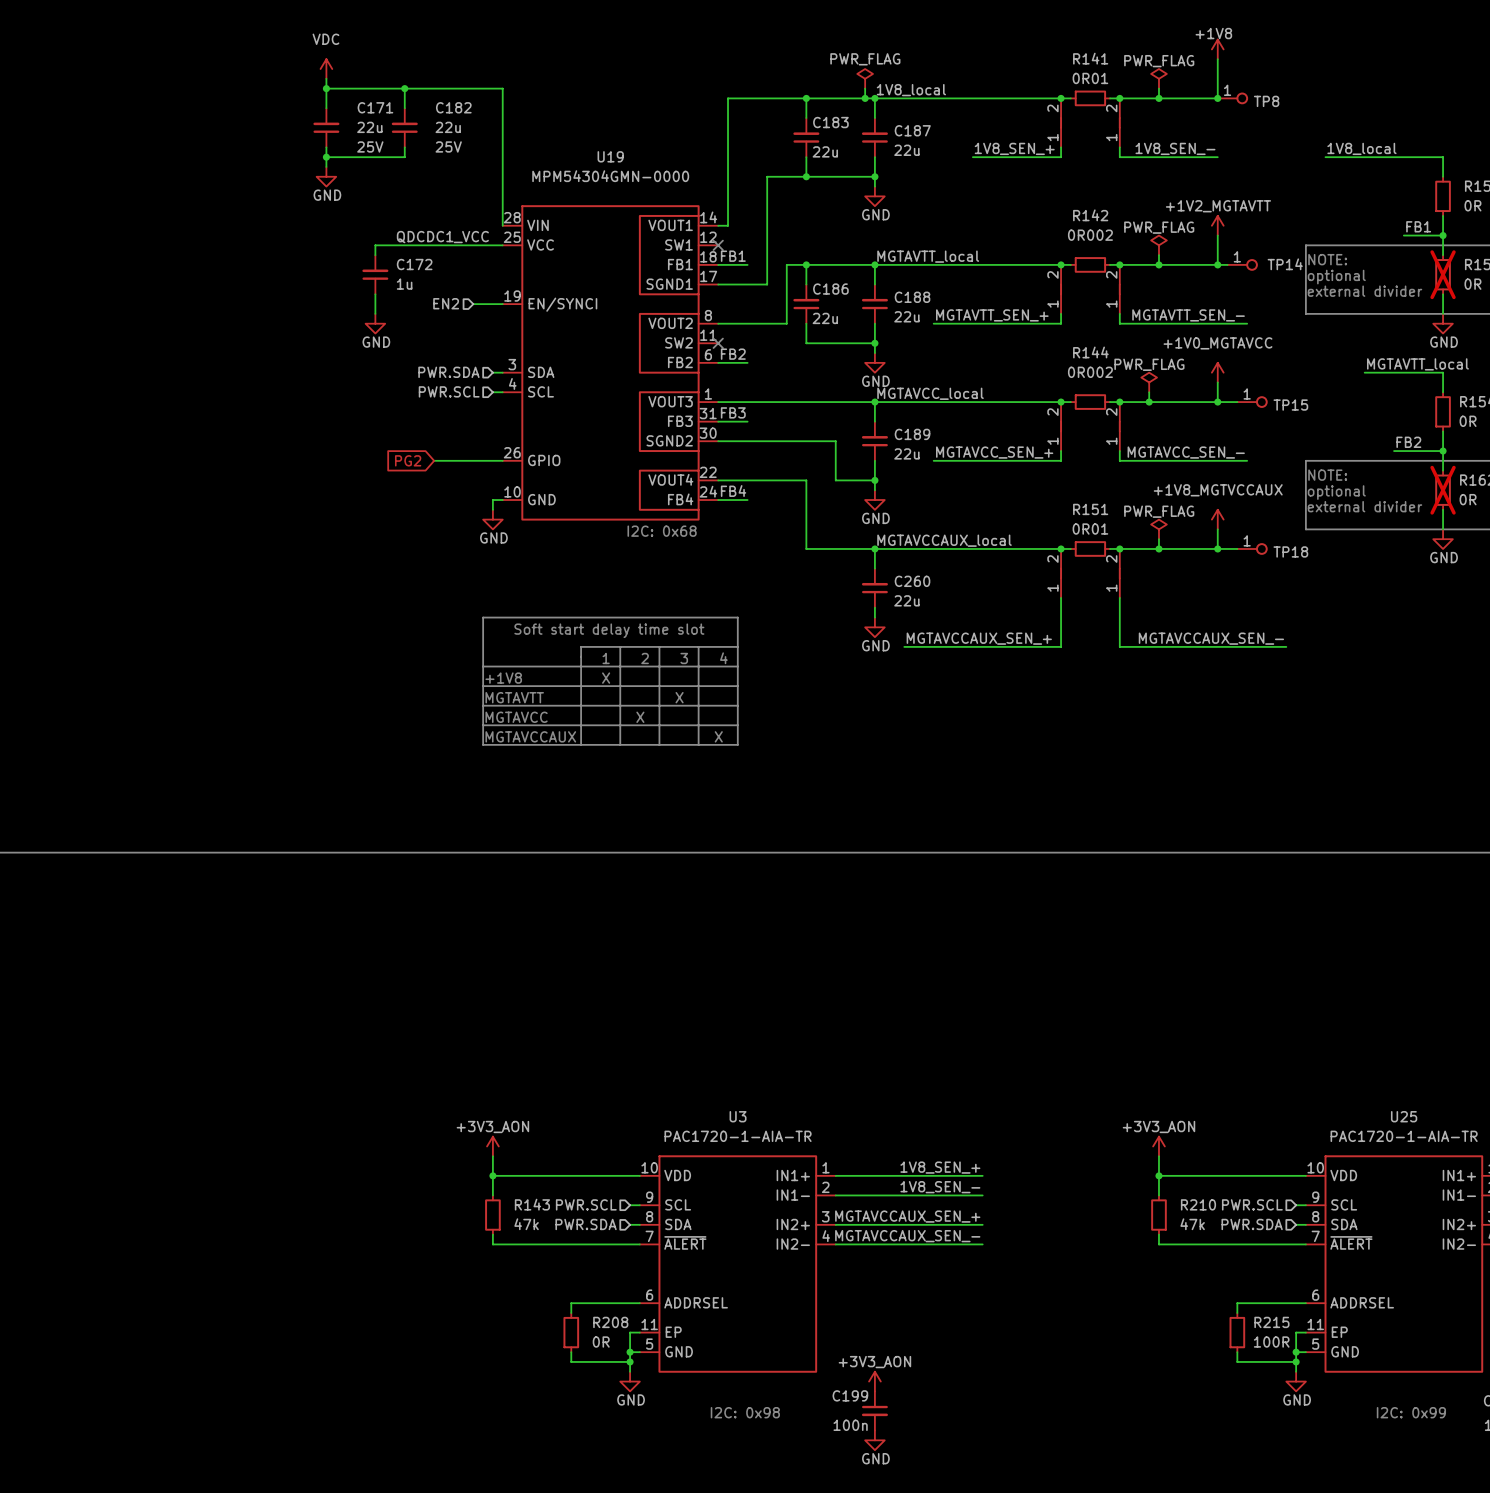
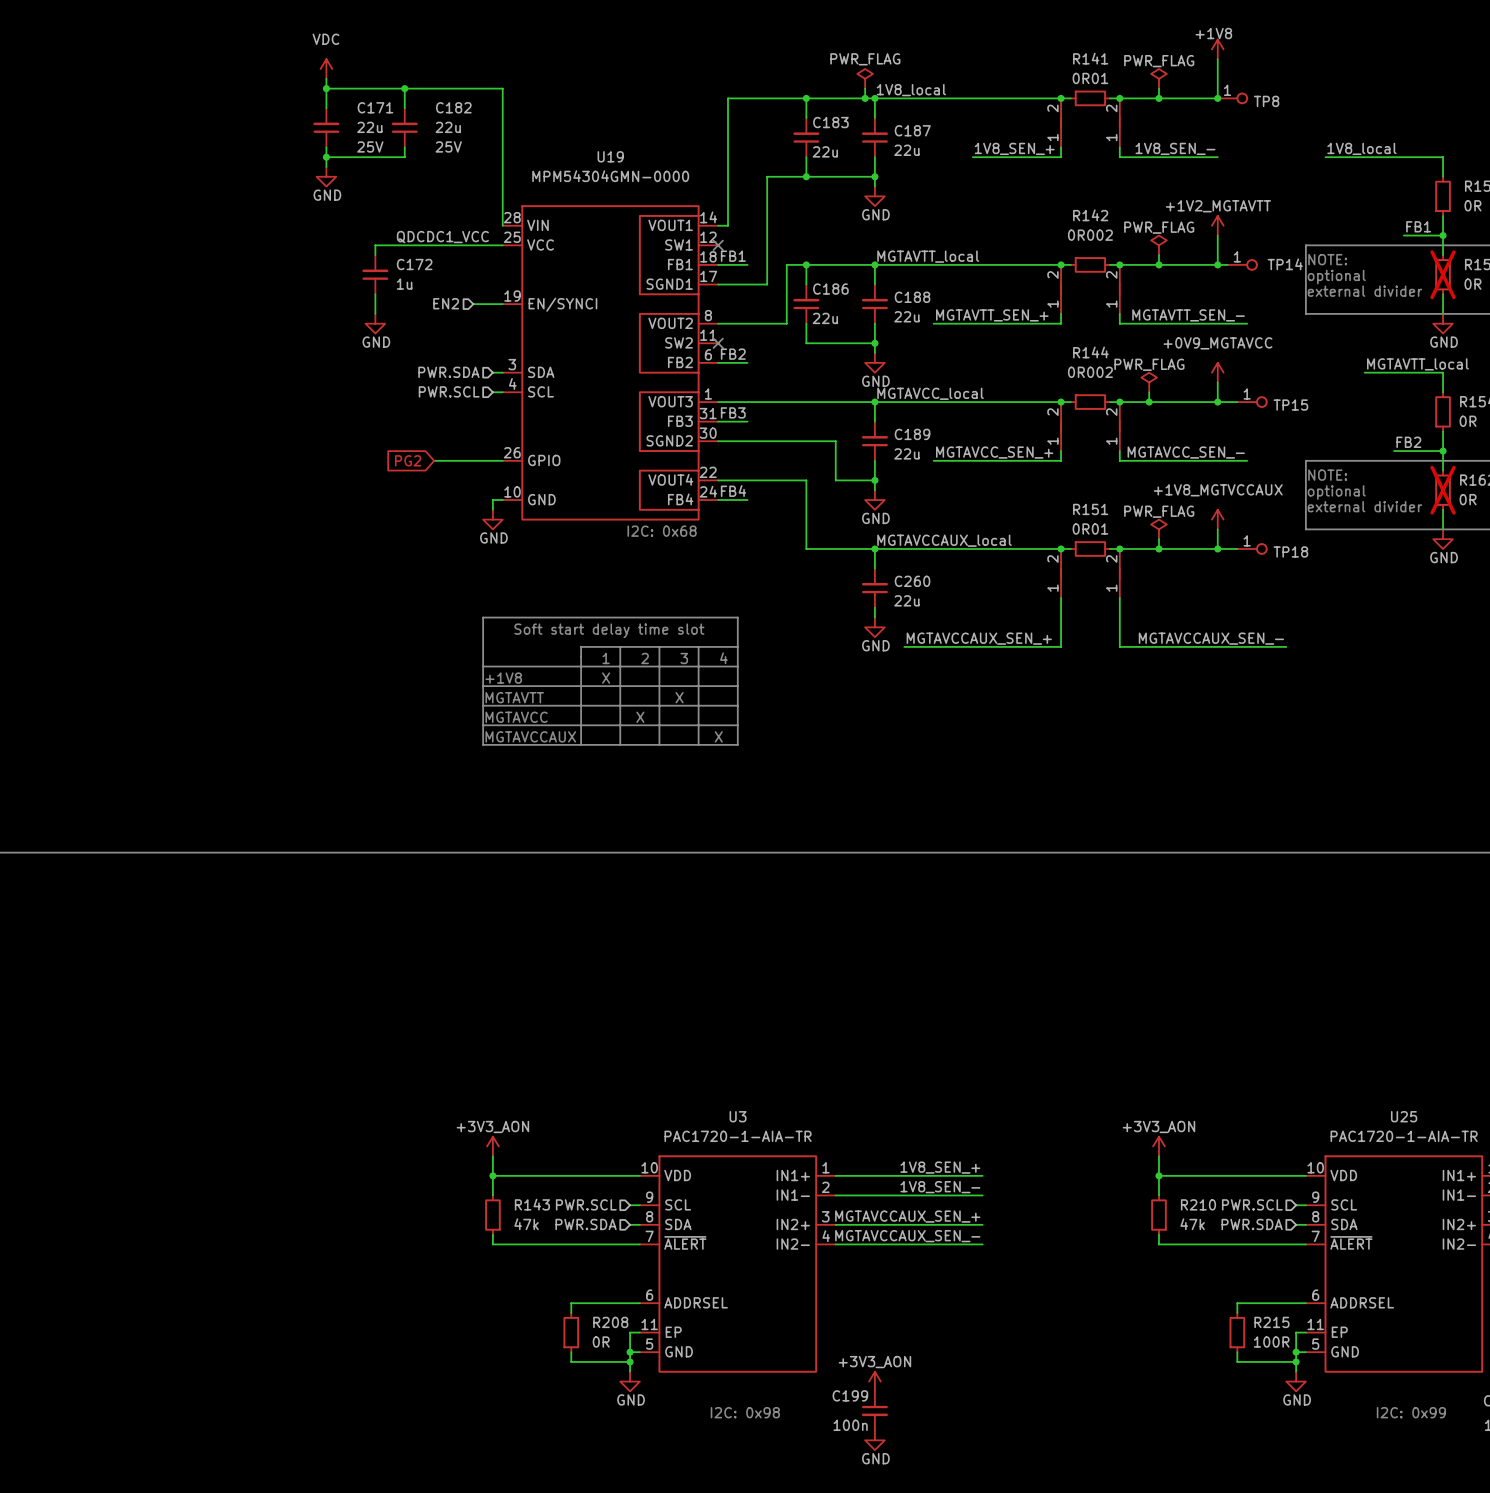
power symbol: +1V0_MGTAVCC (1217, 372) -> +0V9_MGTAVCC (1217, 372)

